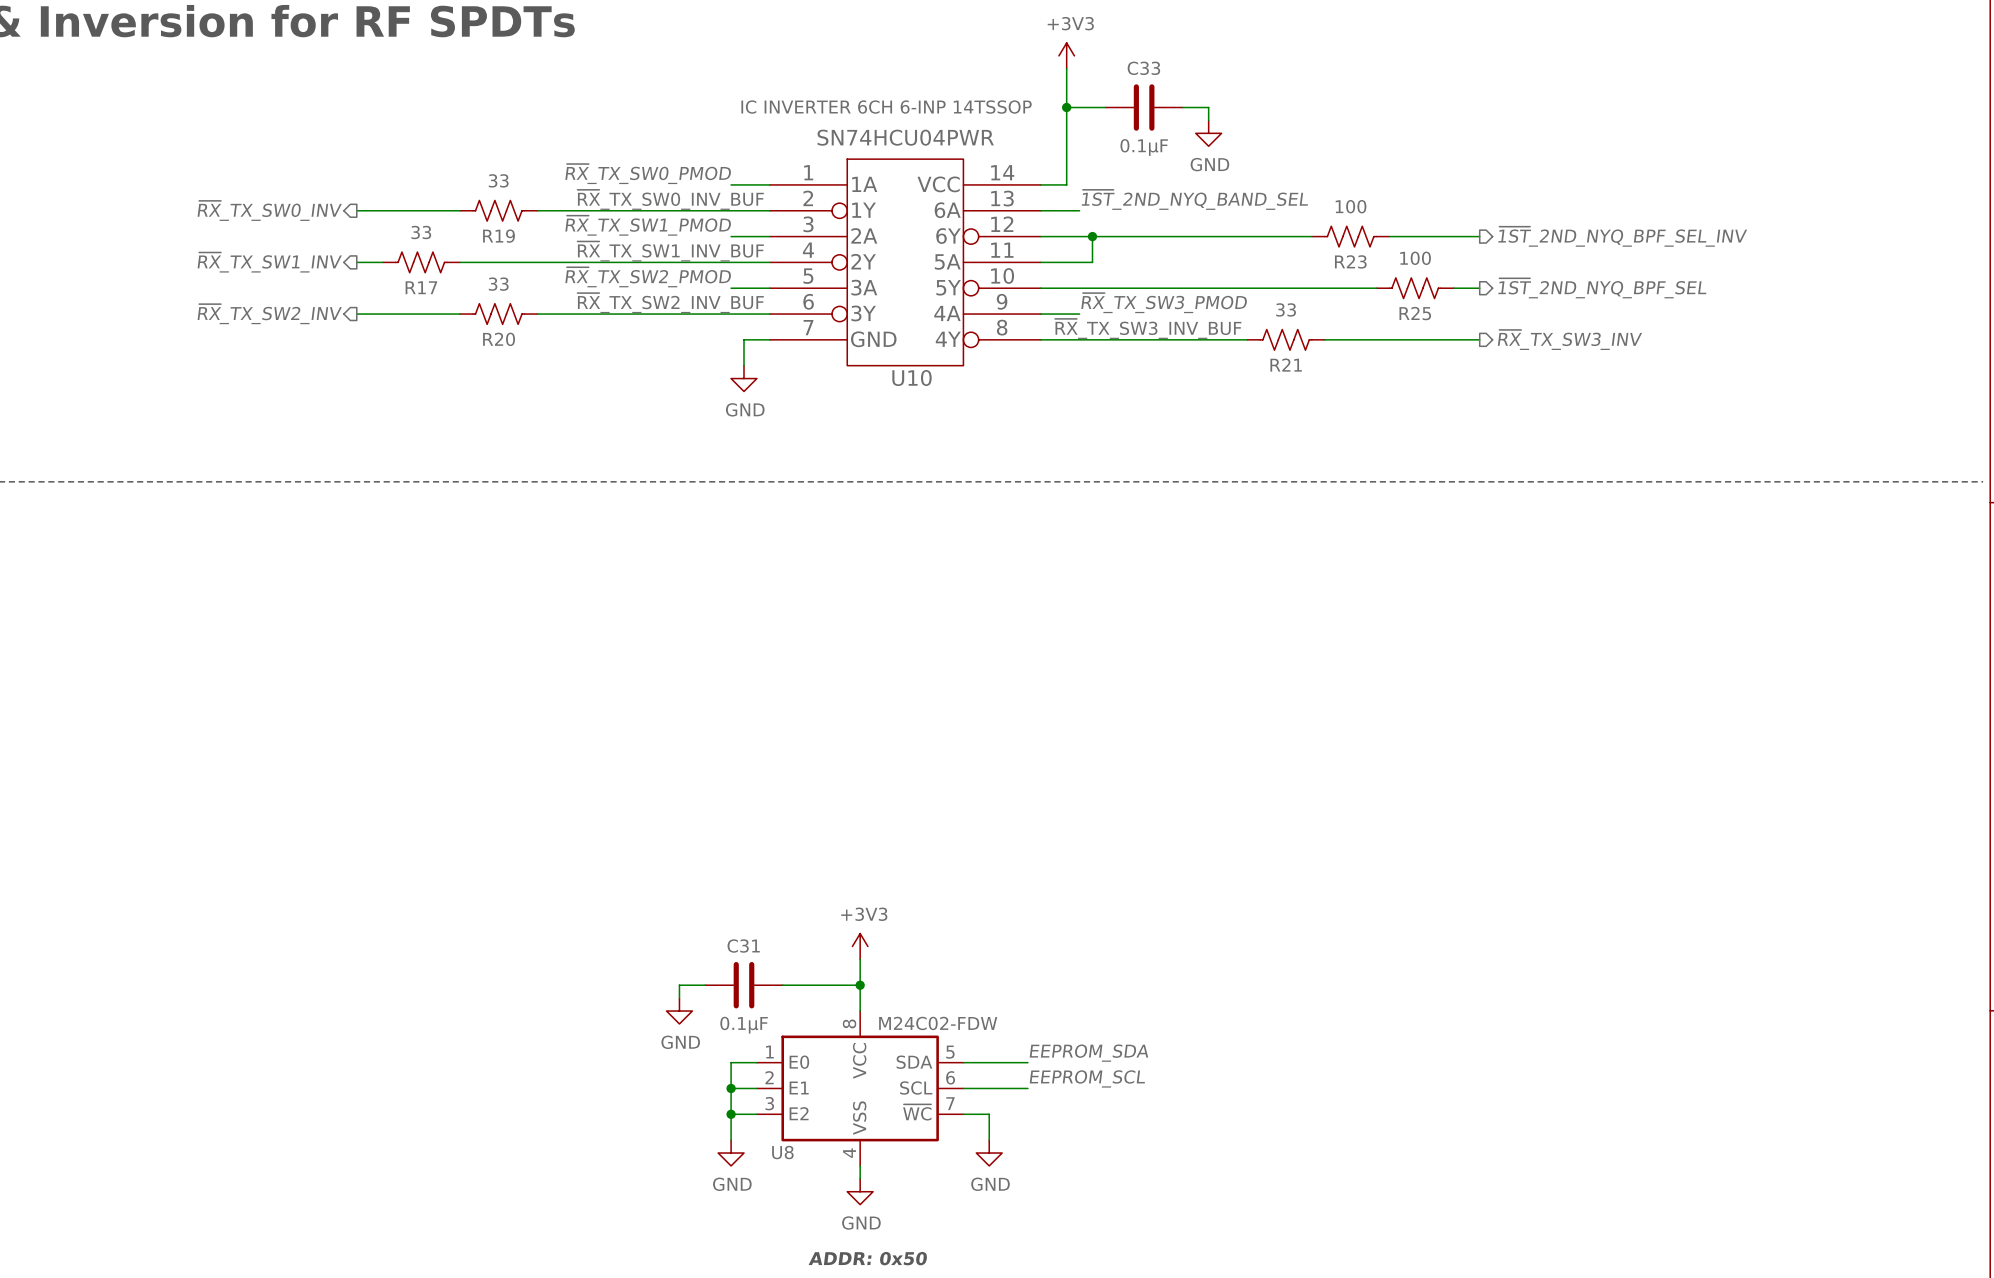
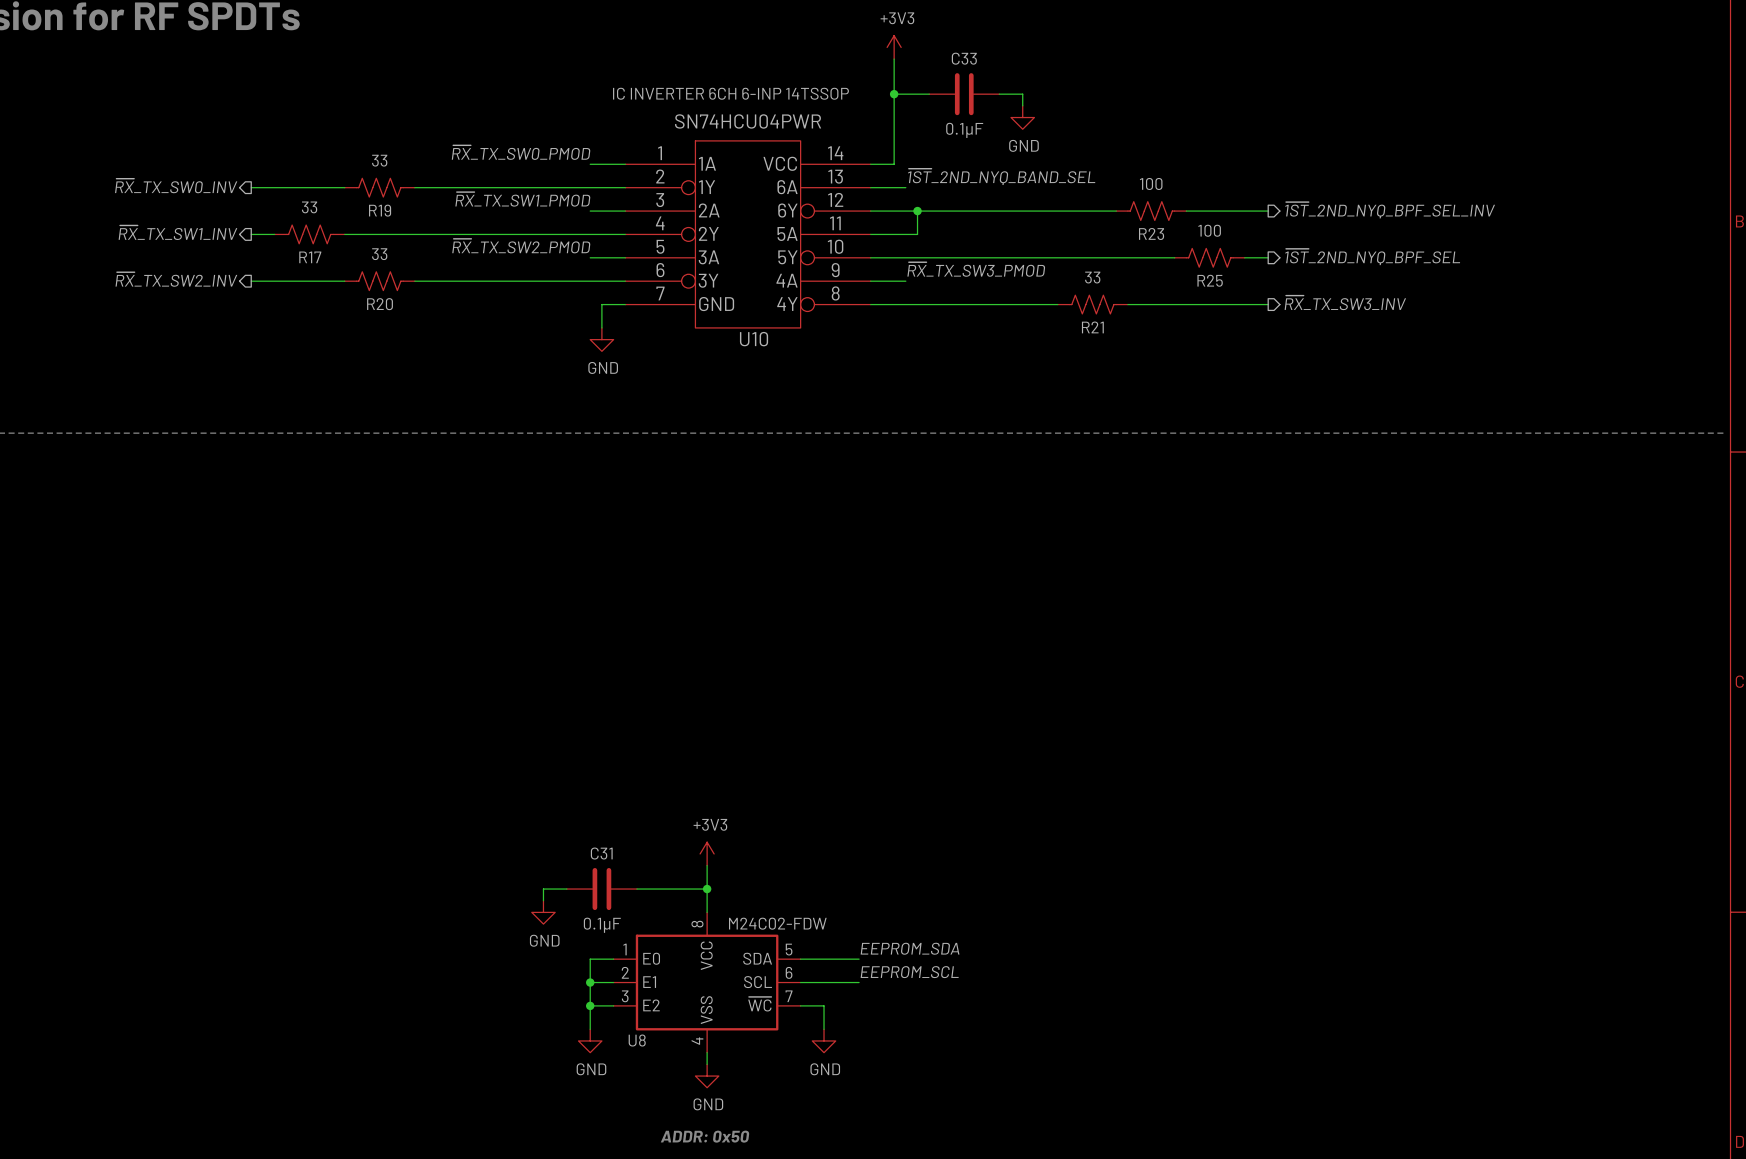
label: ~{RX}_TX_SW0_INV_BUF (670, 199) -> none
label: ~{RX}_TX_SW1_INV_BUF (670, 251) -> none
label: ~{RX}_TX_SW2_INV_BUF (670, 303) -> none
label: ~{RX}_TX_SW3_INV_BUF (1148, 328) -> none

